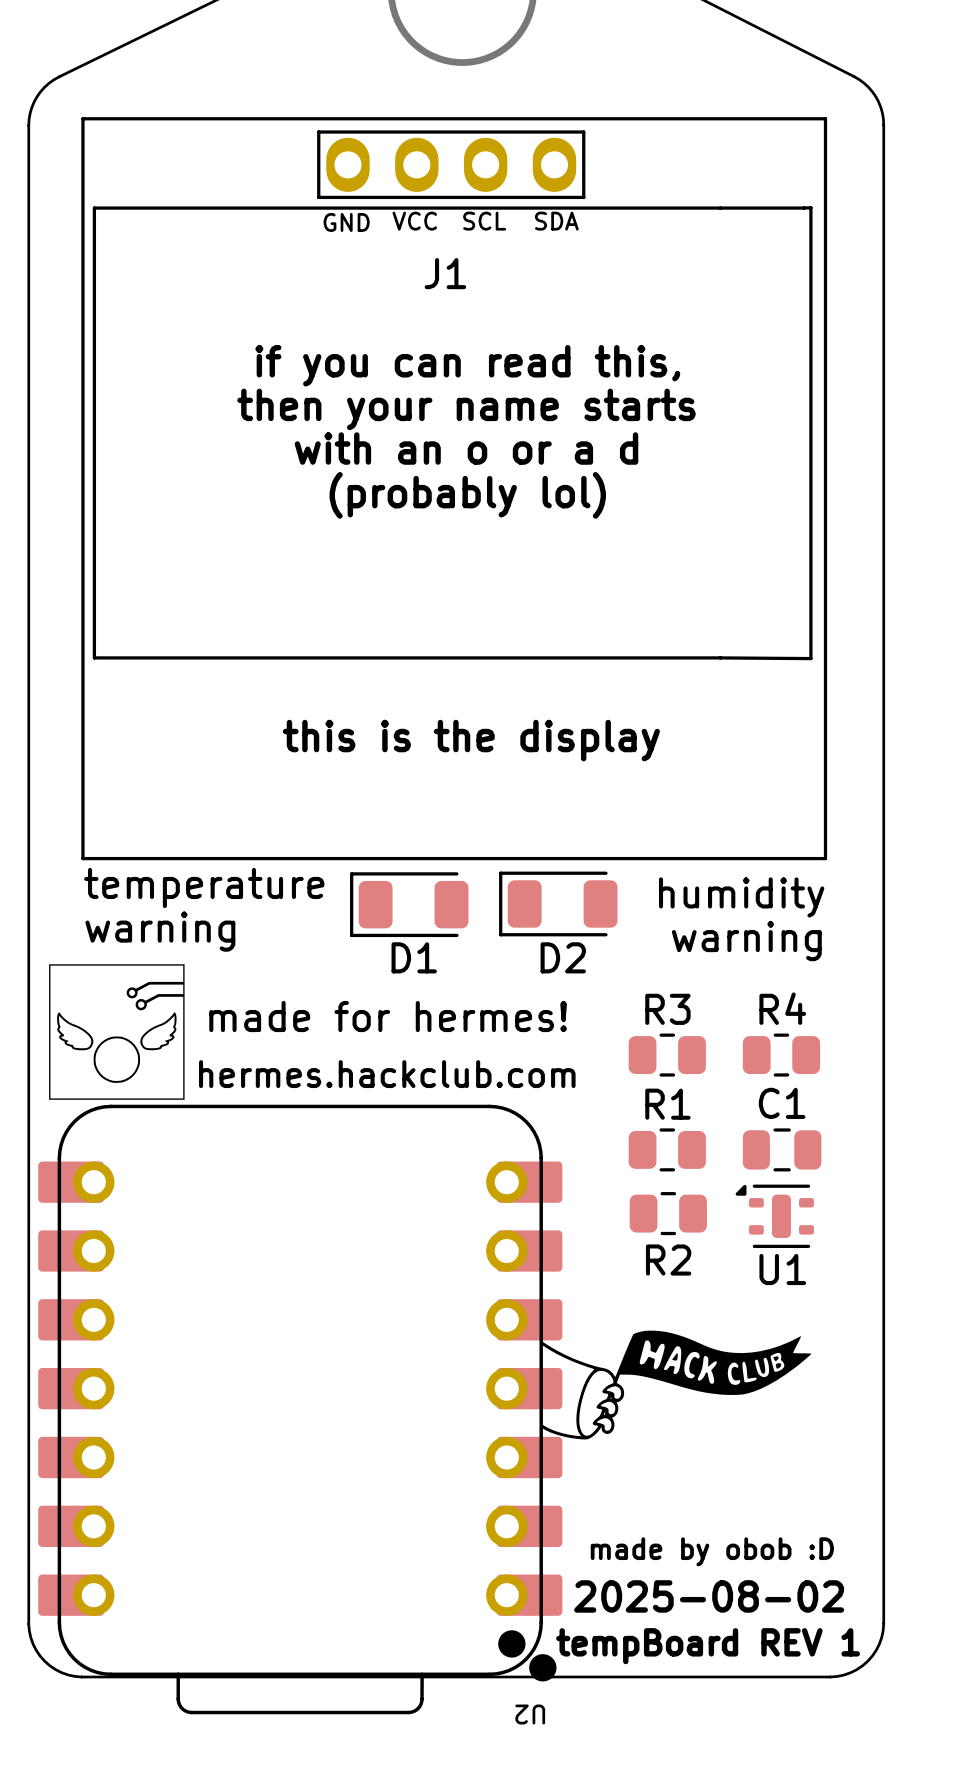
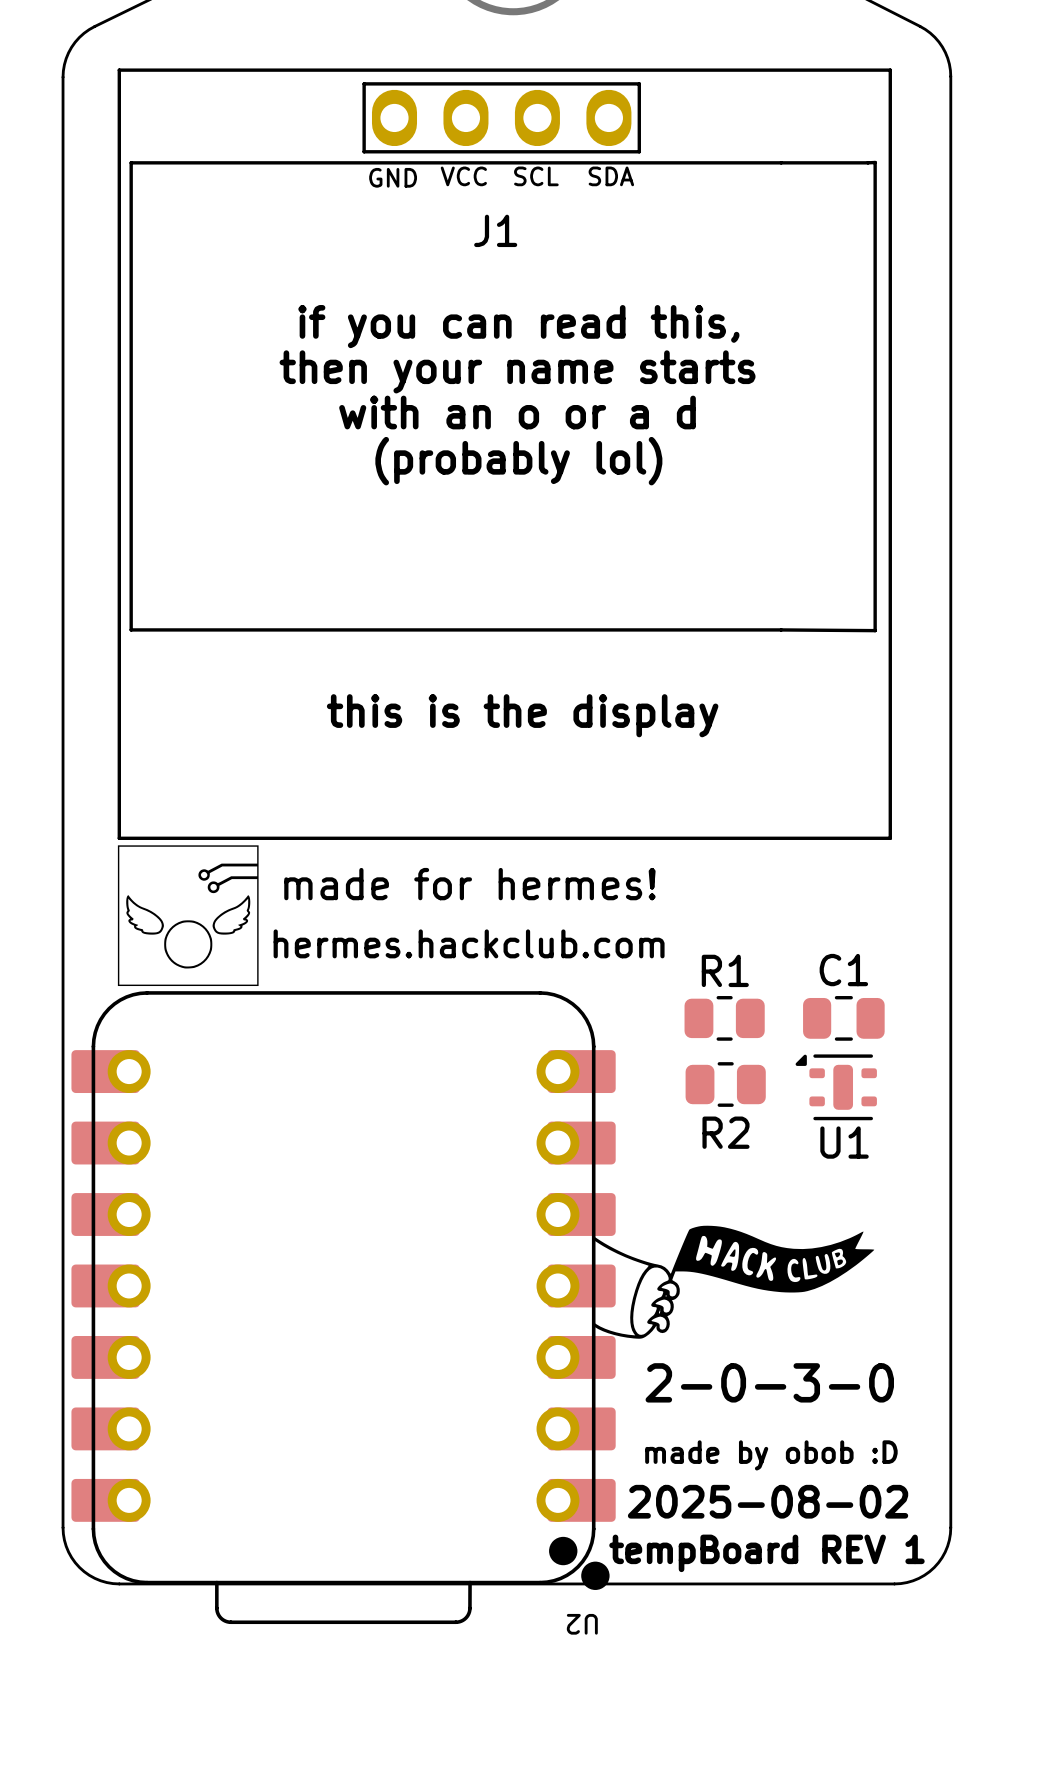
text: temperature (204, 887) -> none
text: humidity (741, 897) -> none
D2: (558, 903) -> none
D1: (409, 904) -> none
text: warning (160, 931) -> none
text: warning (746, 941) -> none
text position: made for hermes! (388, 1016) -> made for hermes! (469, 884)
drawing position: (116, 1032) -> (188, 915)
R3: (667, 1055) -> none
R4: (781, 1055) -> none
text position: hermes.hackclub.com (387, 1074) -> hermes.hackclub.com (469, 943)
R1 position: (667, 1149) -> (724, 1018)
C1 position: (782, 1149) -> (843, 1018)
R2 position: (668, 1213) -> (725, 1084)
U1 position: (774, 1216) -> (836, 1087)
text: none -> 2-0-3-0 (769, 1382)
drawing position: (676, 1385) -> (733, 1282)
U2 position: (300, 1409) -> (343, 1307)
board edge: (28, 1522) (28, 1624) (30, 1637) (36, 1650) (49, 1665) (61, 1672) (81, 1677) (837, 1676) (850, 1672) (867, 1661) (876, 1650) (881, 1637) (883, 1623) (883, 1522) -> (63, 1527) (66, 1546) (79, 1567) (94, 1578) (119, 1583) (900, 1583) (918, 1578) (934, 1567) (945, 1552) (950, 1527)
text position: made by obob :D (712, 1551) -> made by obob :D (771, 1455)
text position: 2025-08-02 (709, 1596) -> 2025-08-02 (768, 1501)
text position: tempBoard REV 1 (708, 1646) -> tempBoard REV 1 (766, 1553)

